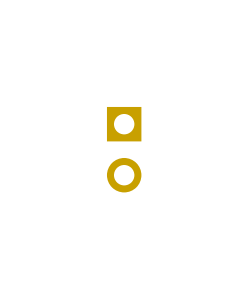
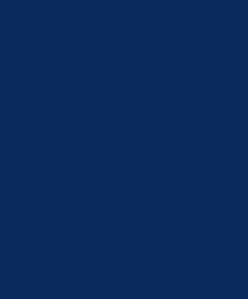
part: (124, 149) -> none

